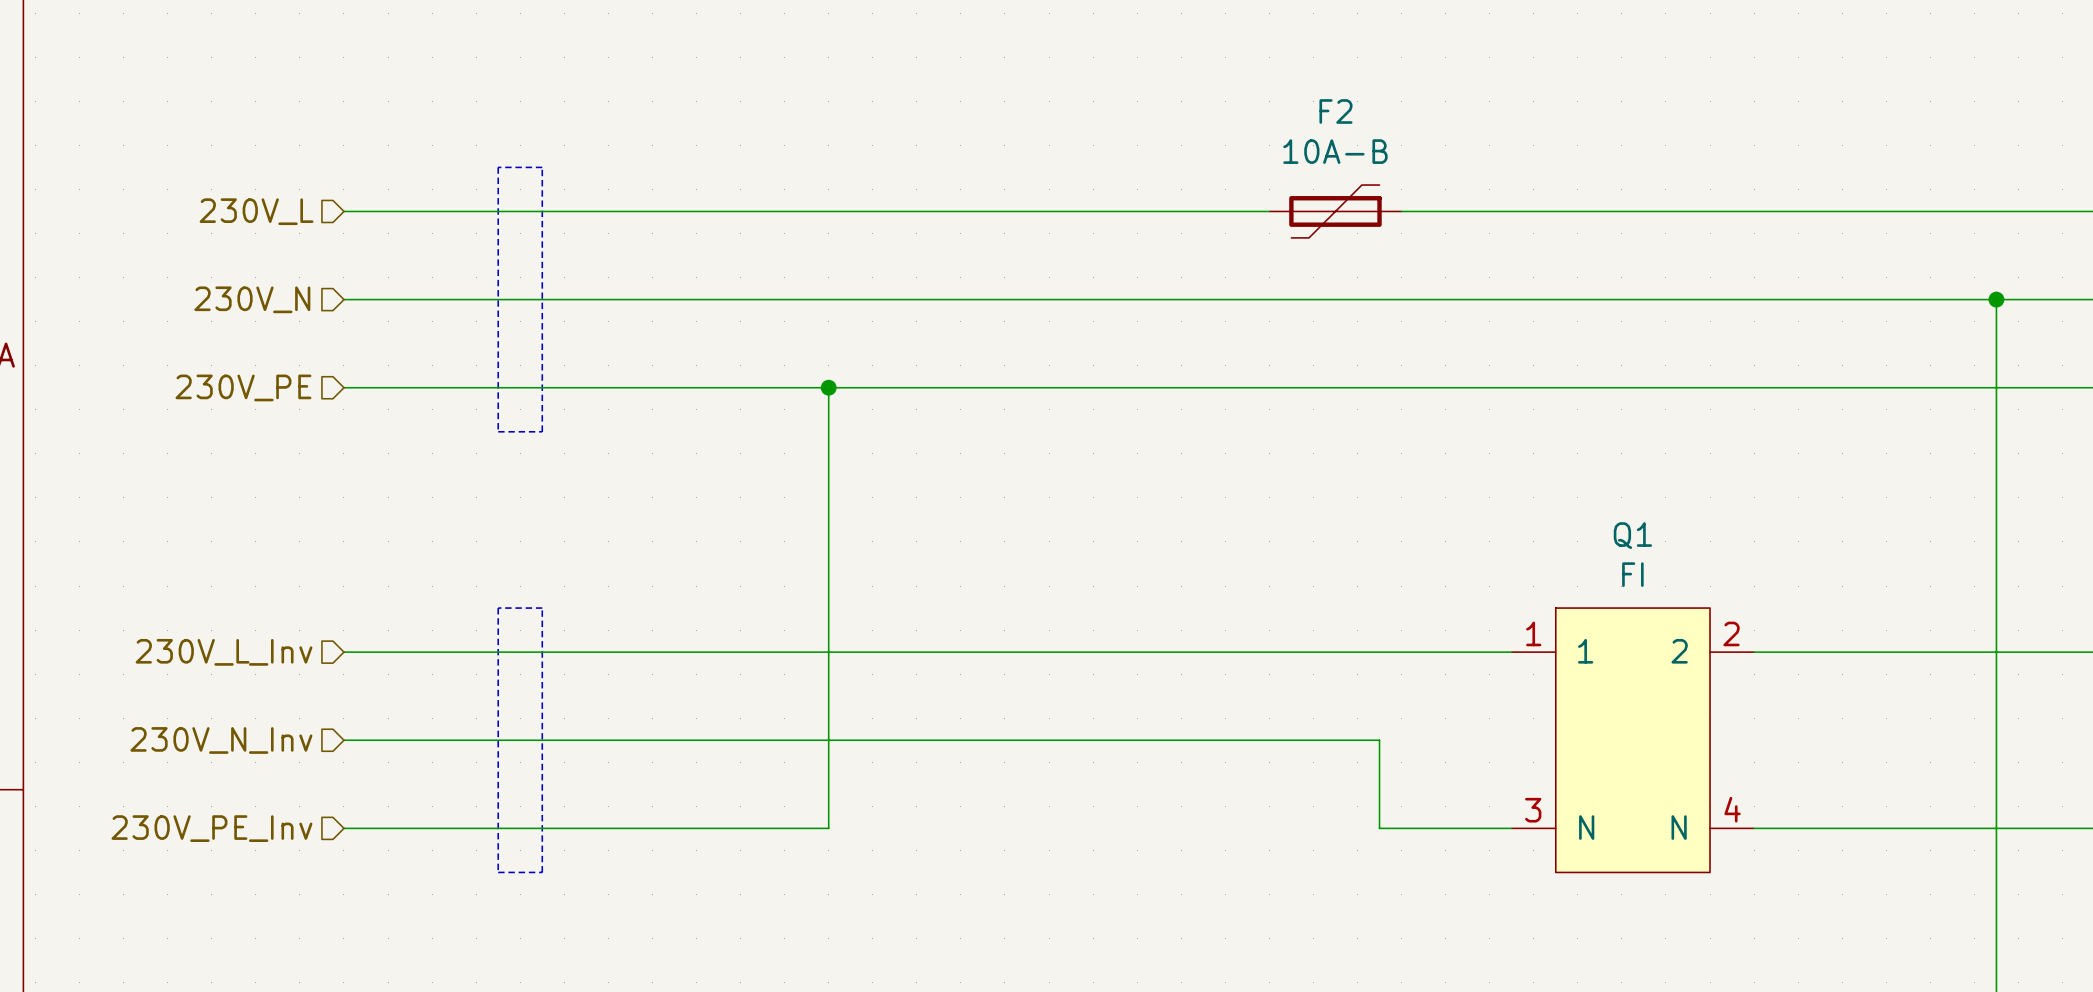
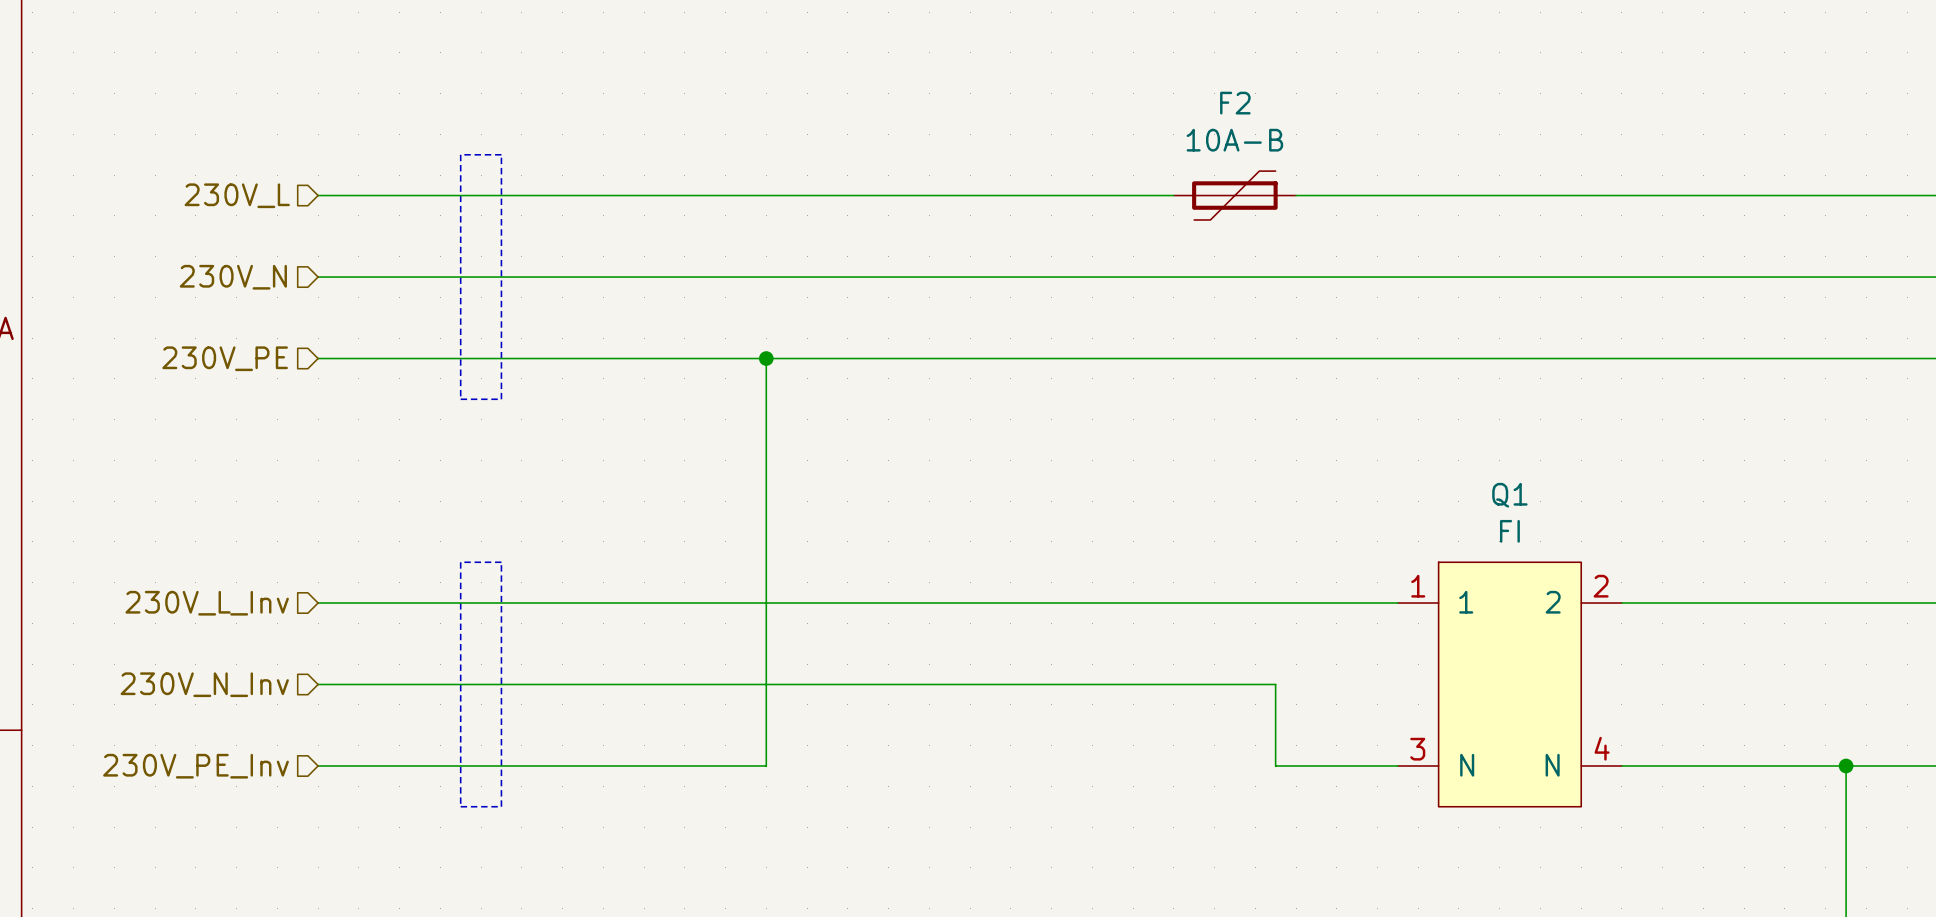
wire: (1996, 299) (1996, 828) -> none
junction: (1996, 299) -> none
junction: none -> (1846, 765)

